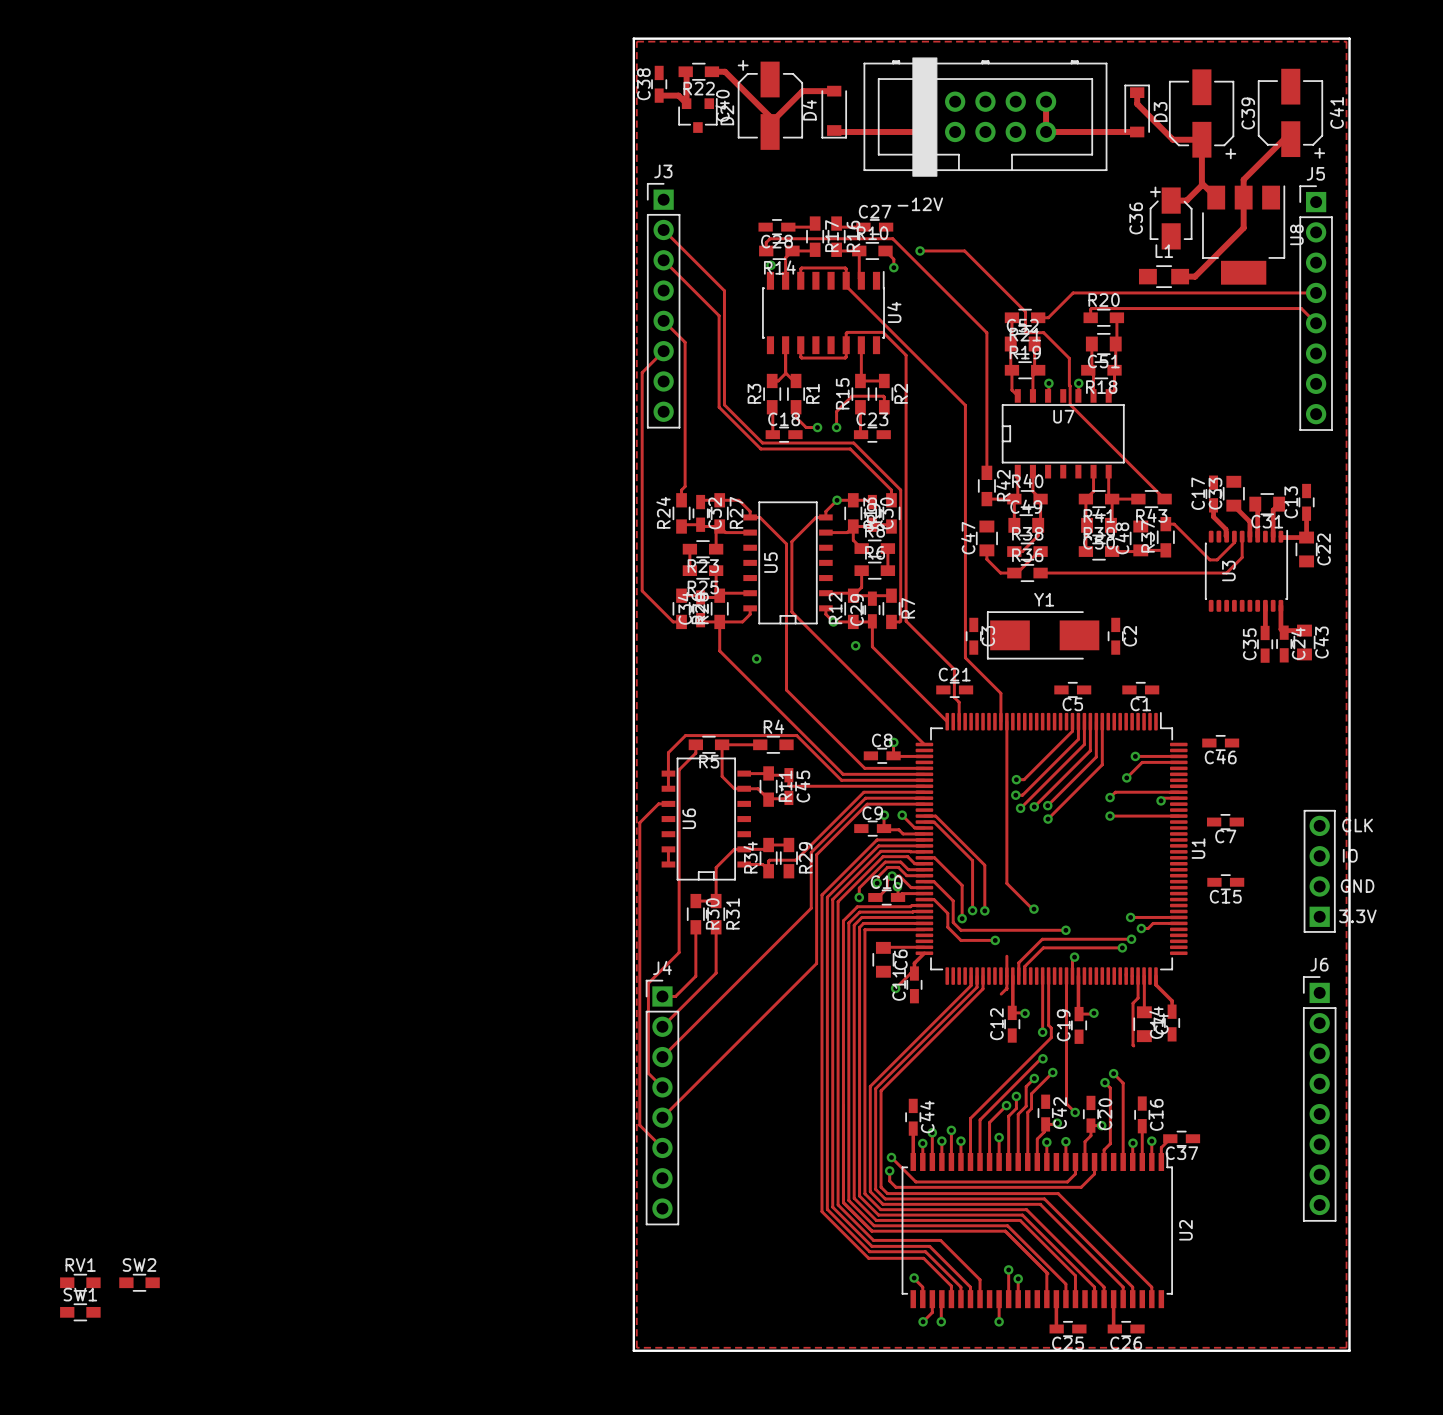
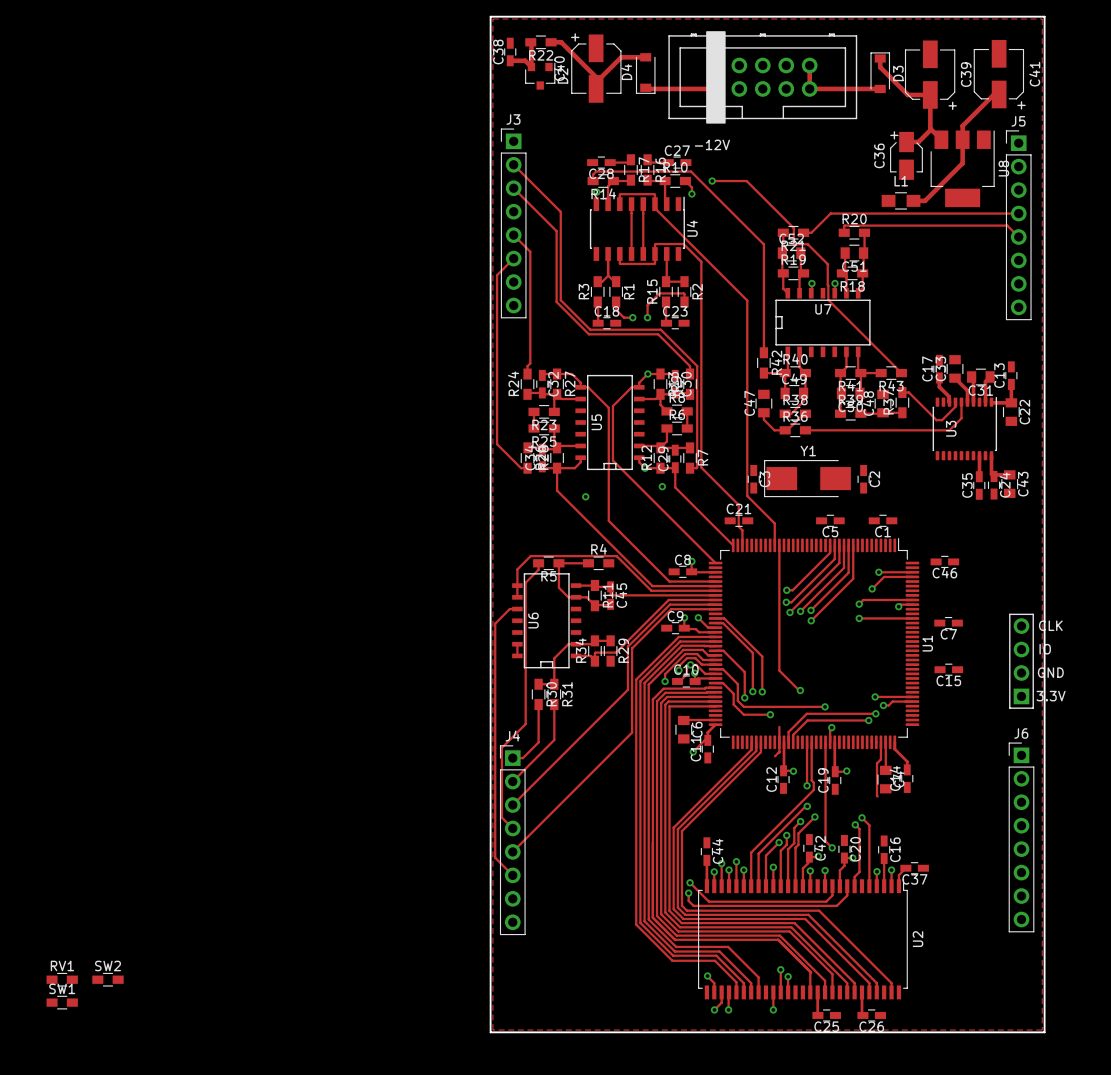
track: none -> (631, 204) (631, 253)
track: none -> (643, 204) (643, 253)

